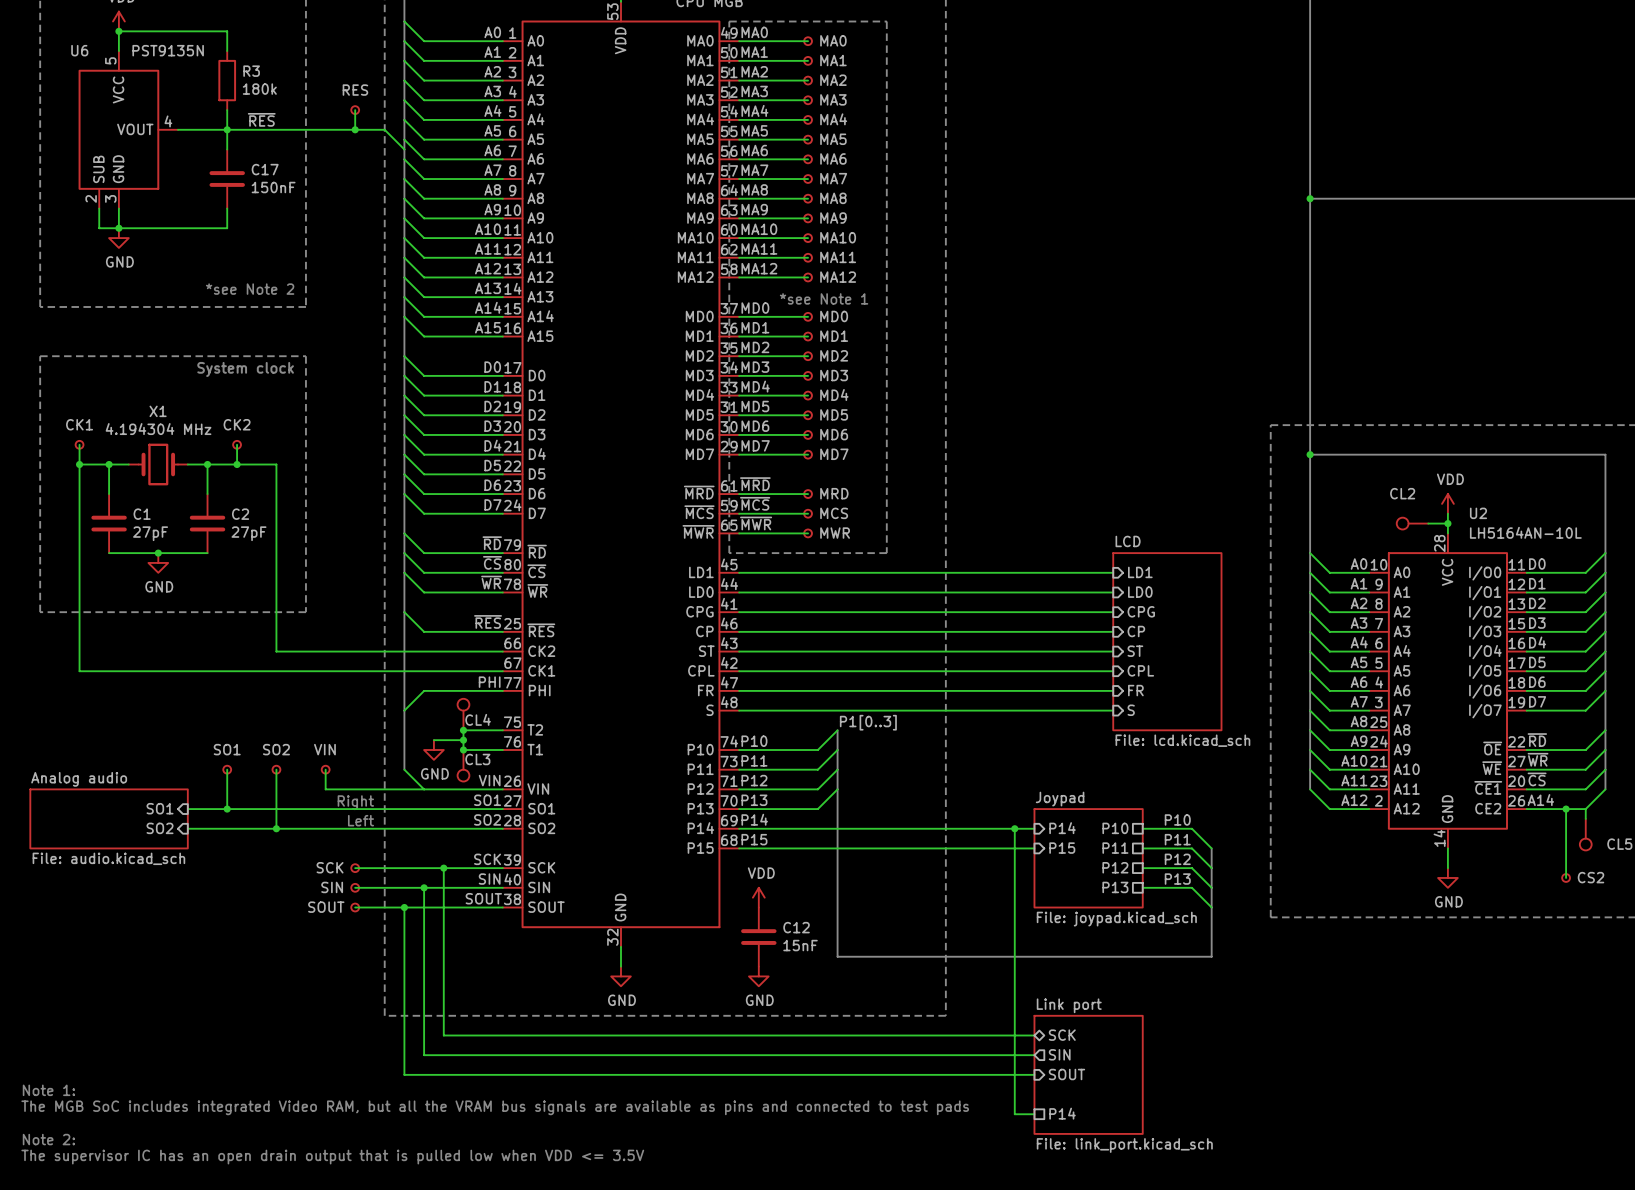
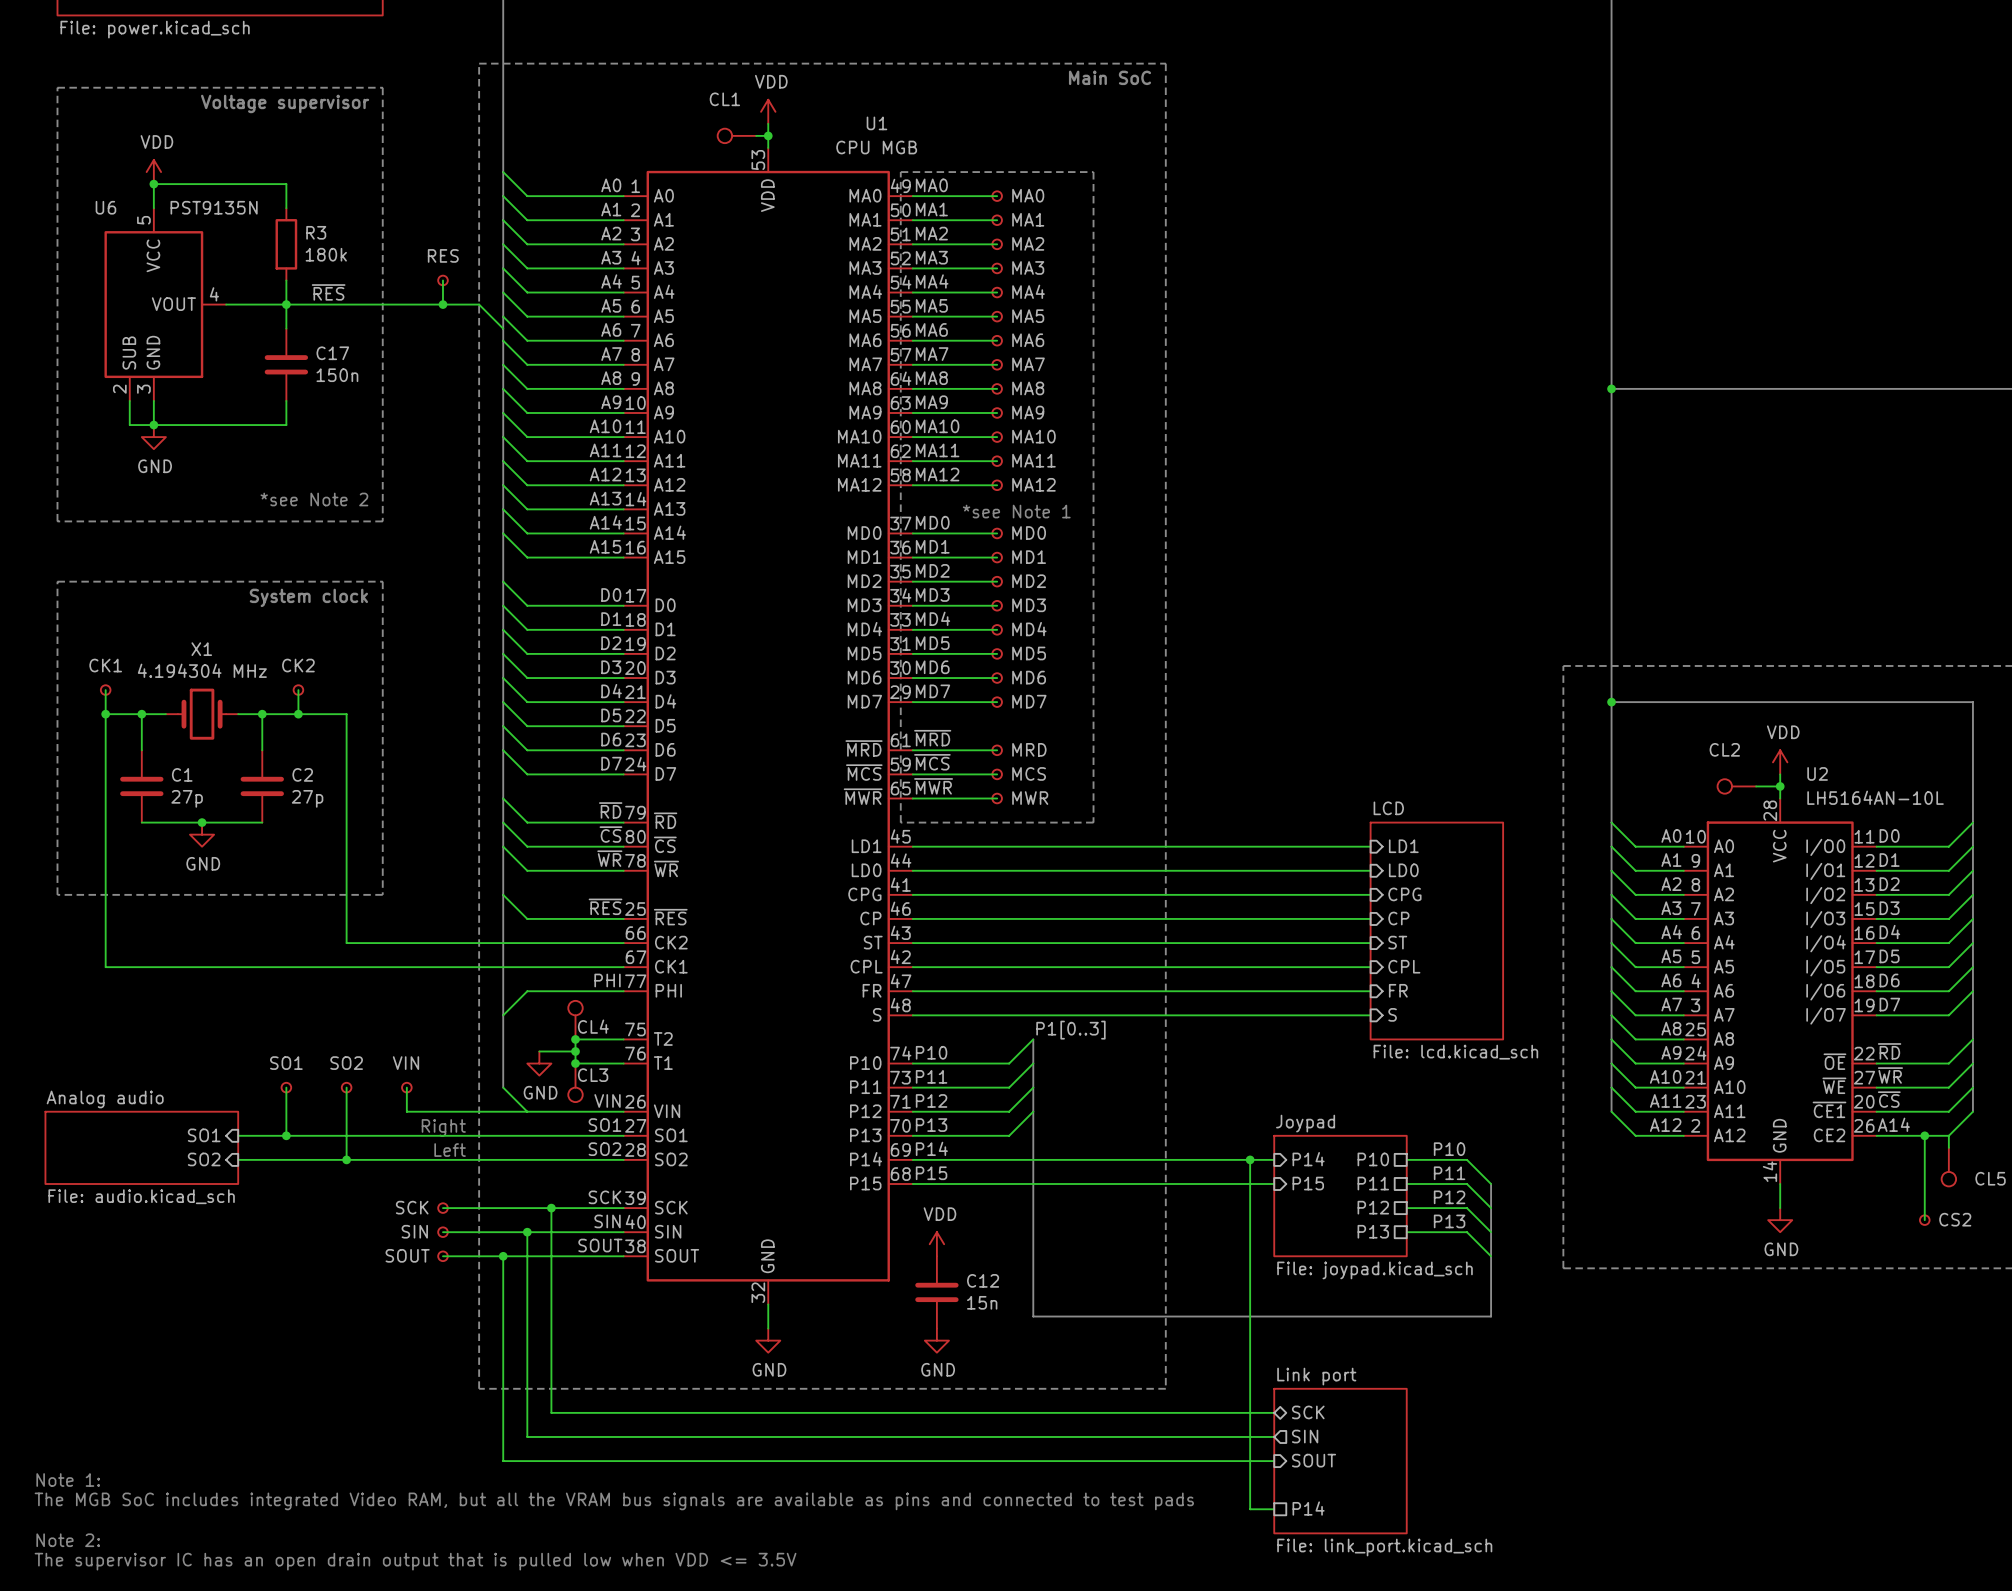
C17 value: 150nF (273, 187) -> 150n (337, 375)
C1 value: 27pF (150, 533) -> 27p (187, 798)
C2 value: 27pF (248, 533) -> 27p (307, 798)
C12 value: 15nF (800, 945) -> 15n (982, 1302)

